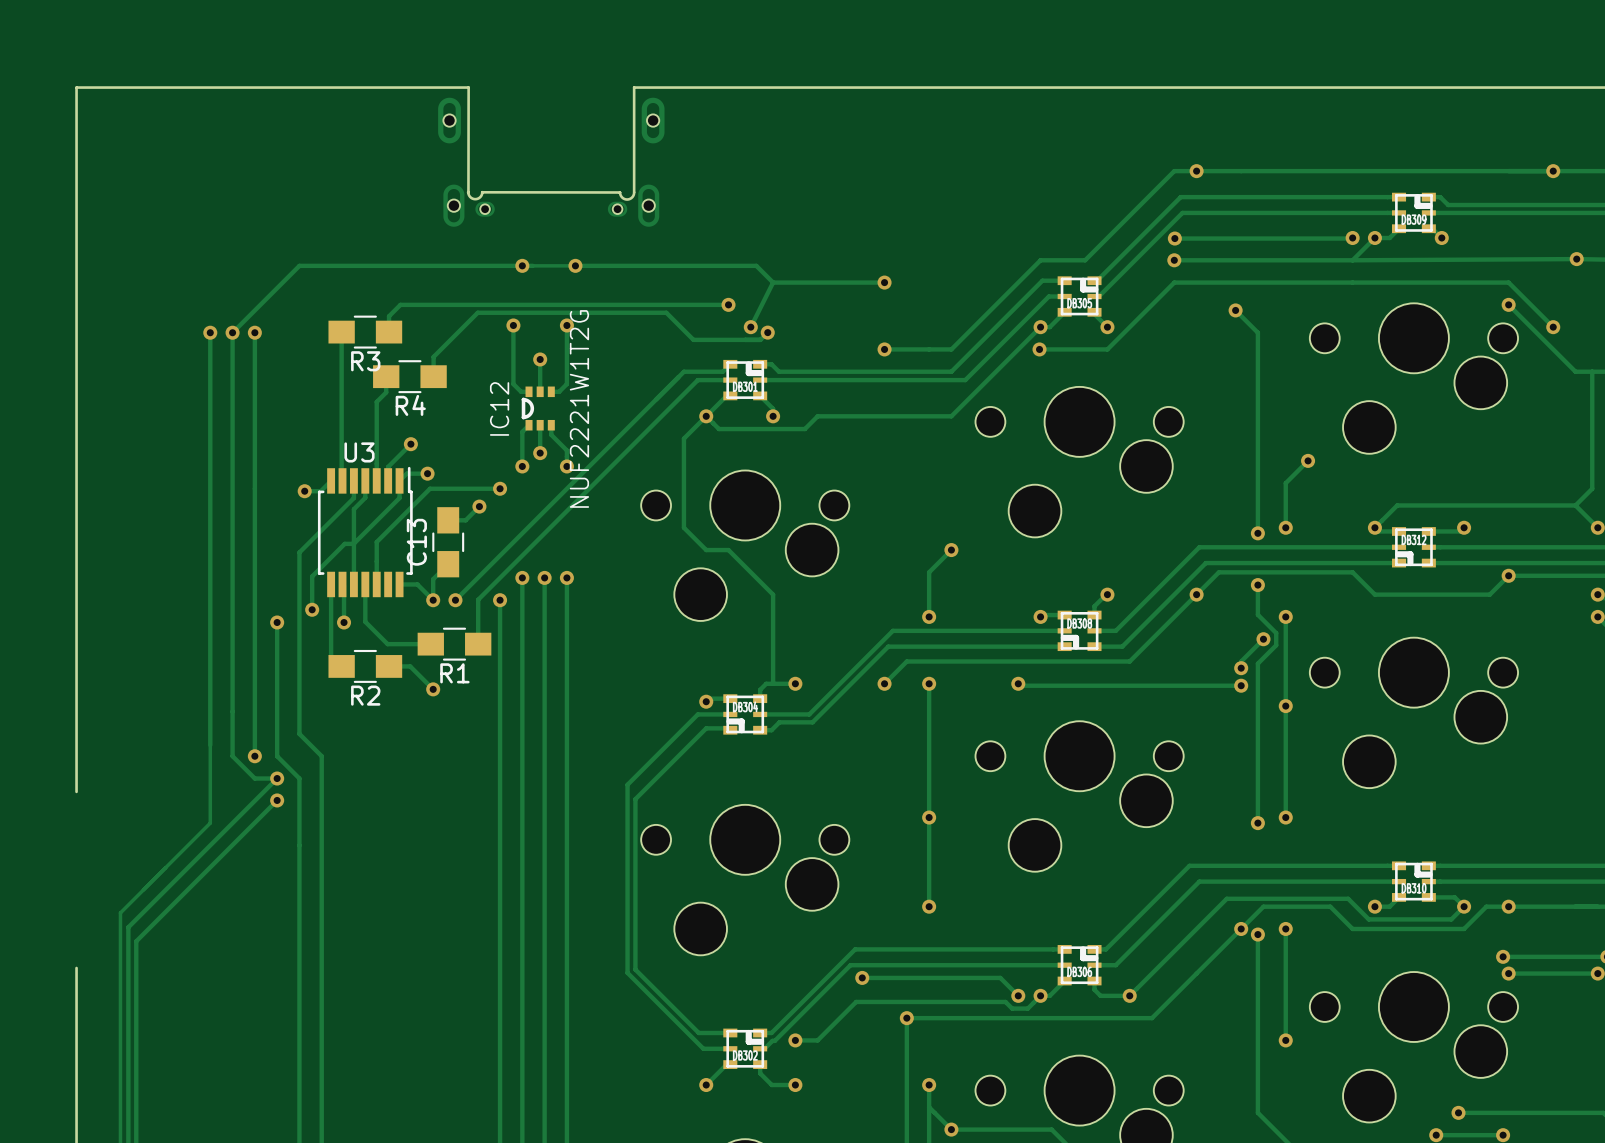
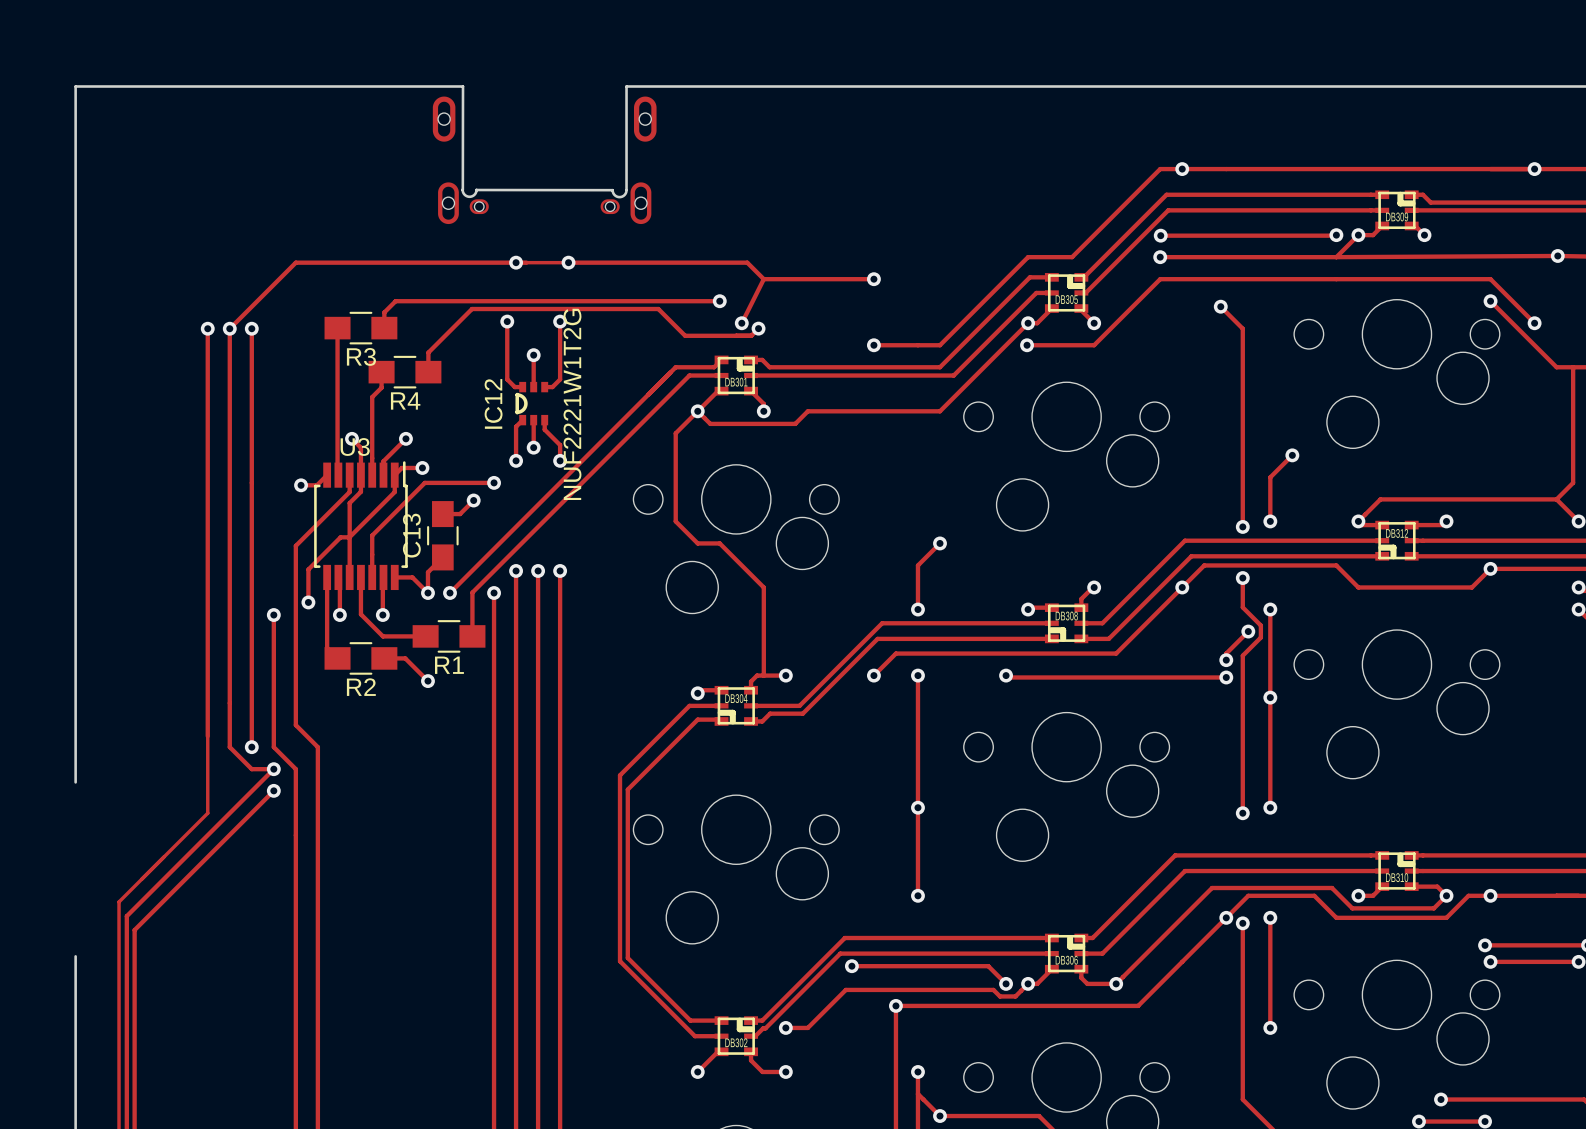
track: none -> (352, 438) (360, 447) (360, 475)
via: none -> (352, 438)
track: none -> (383, 577) (382, 615)
via: none -> (382, 615)

